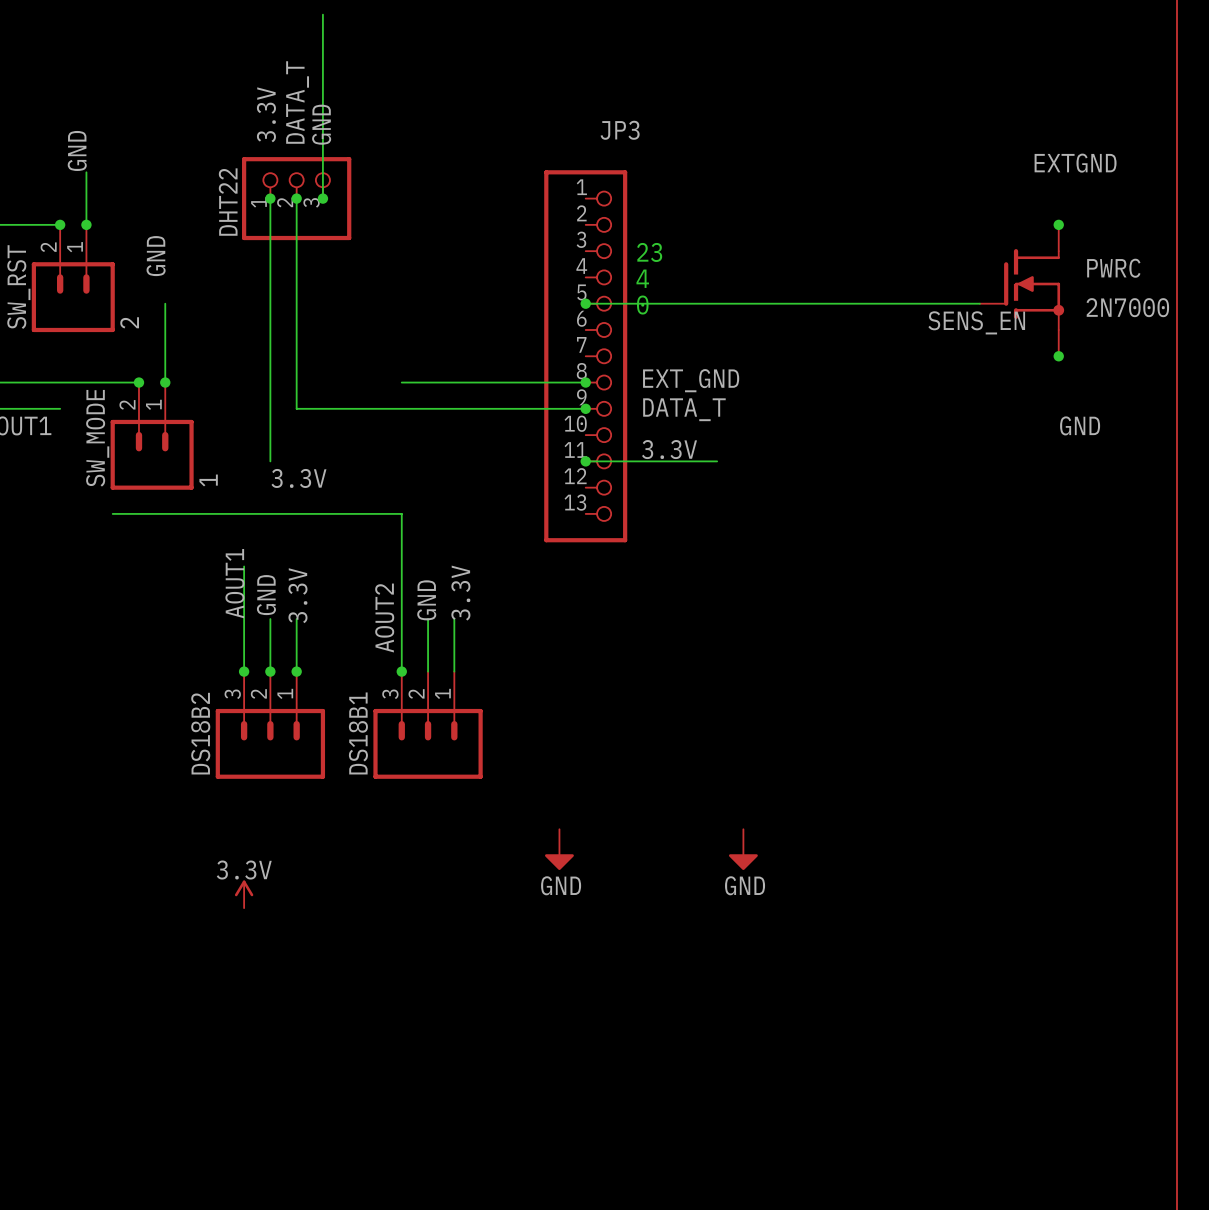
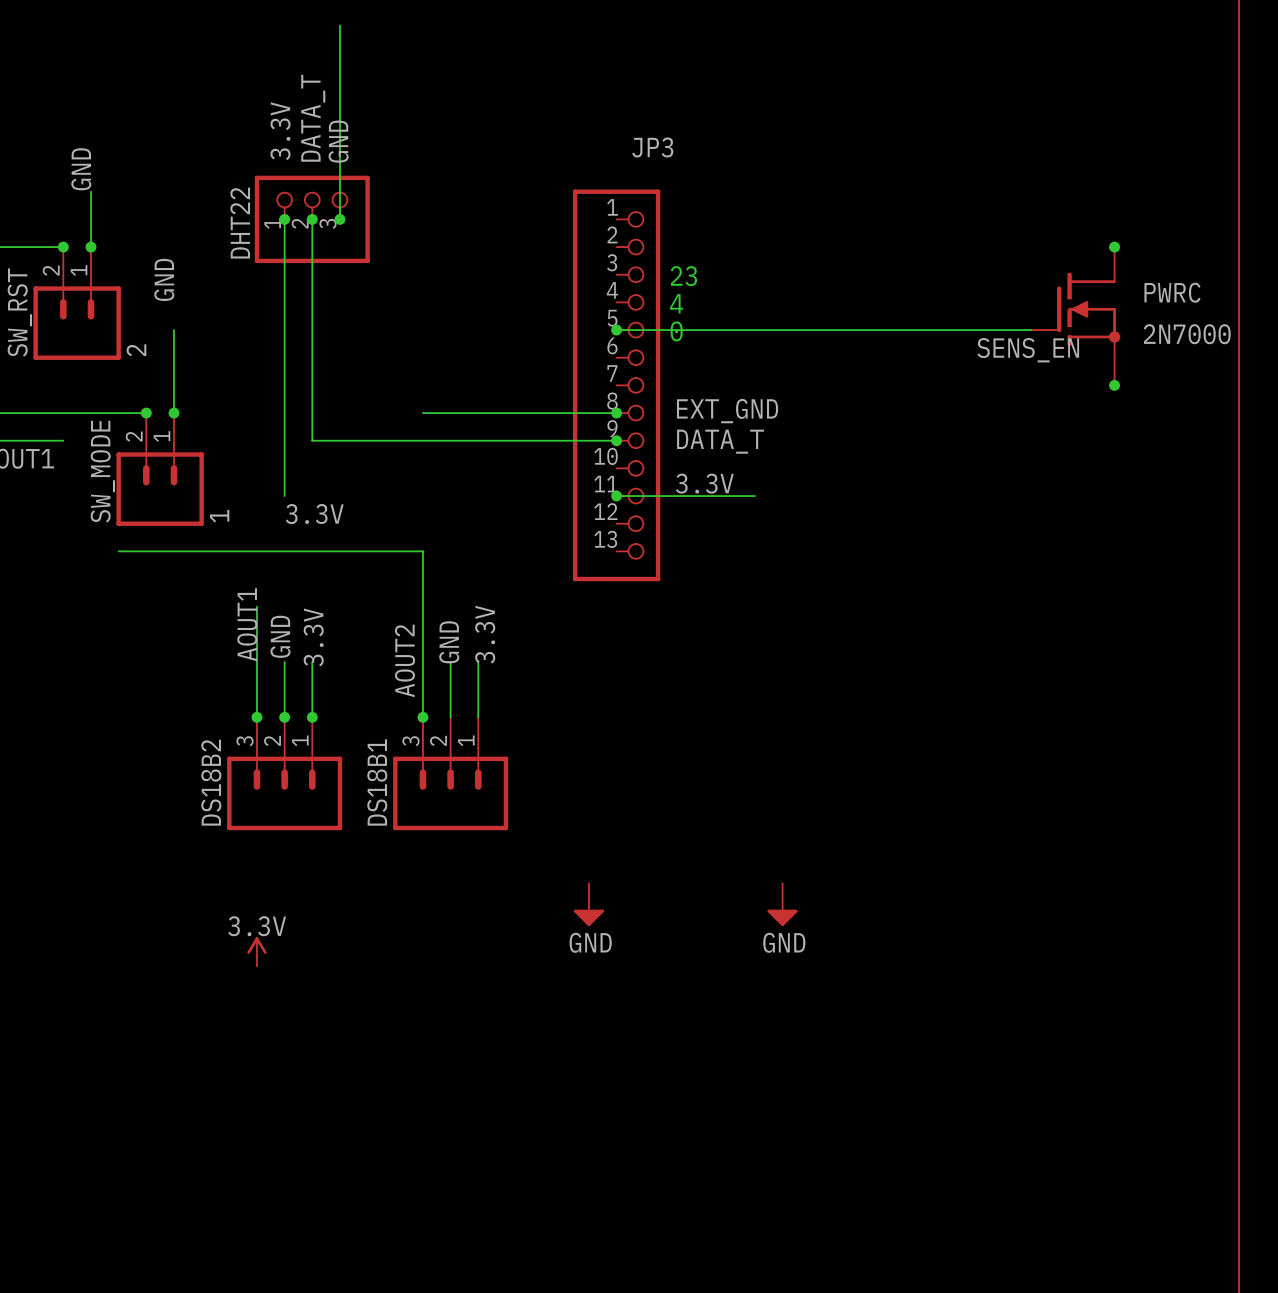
label: EXTGND (1075, 163) -> none
label: GND (1080, 425) -> none

